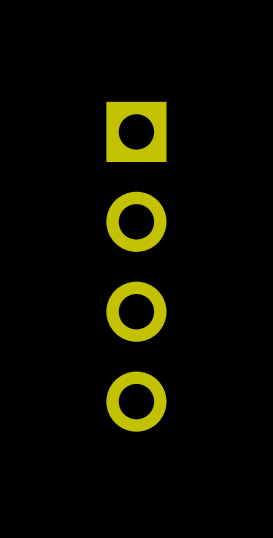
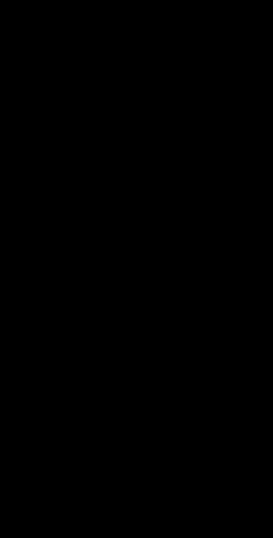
part: (136, 266) -> none

